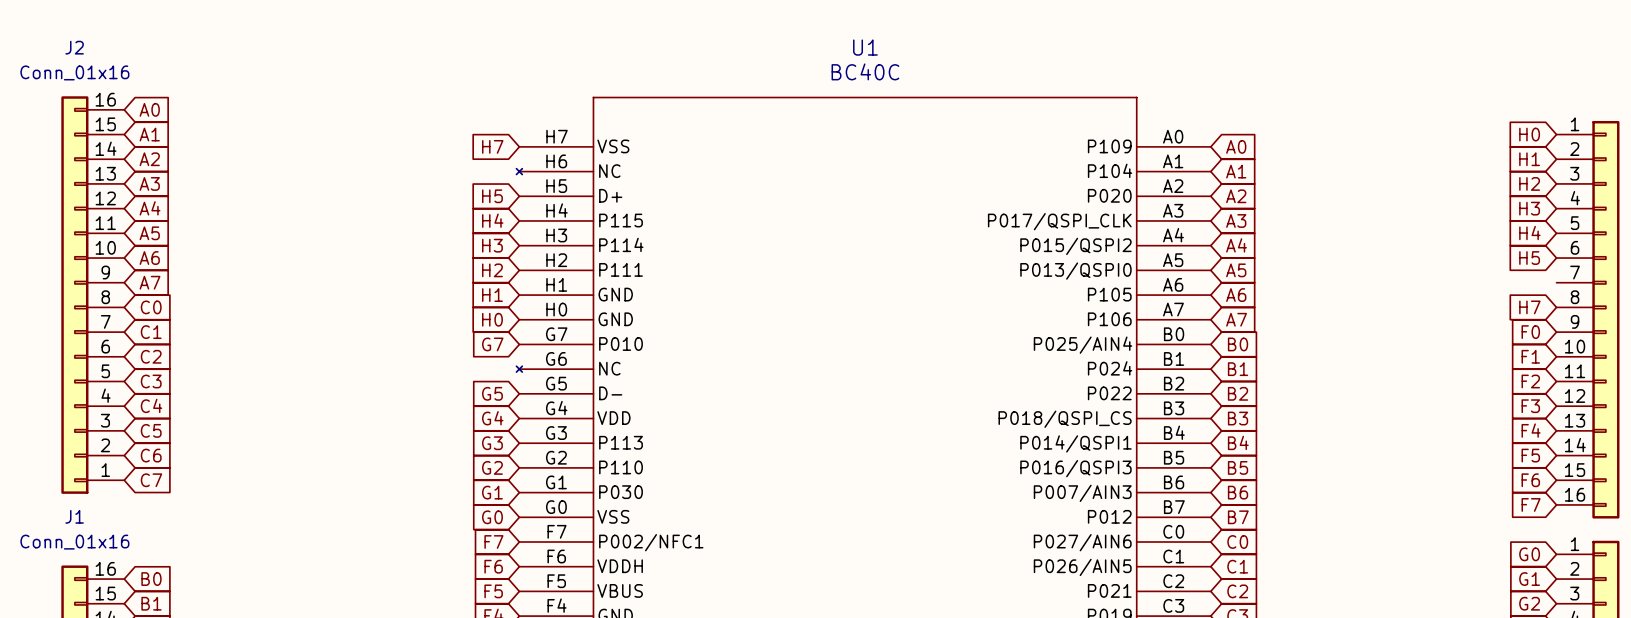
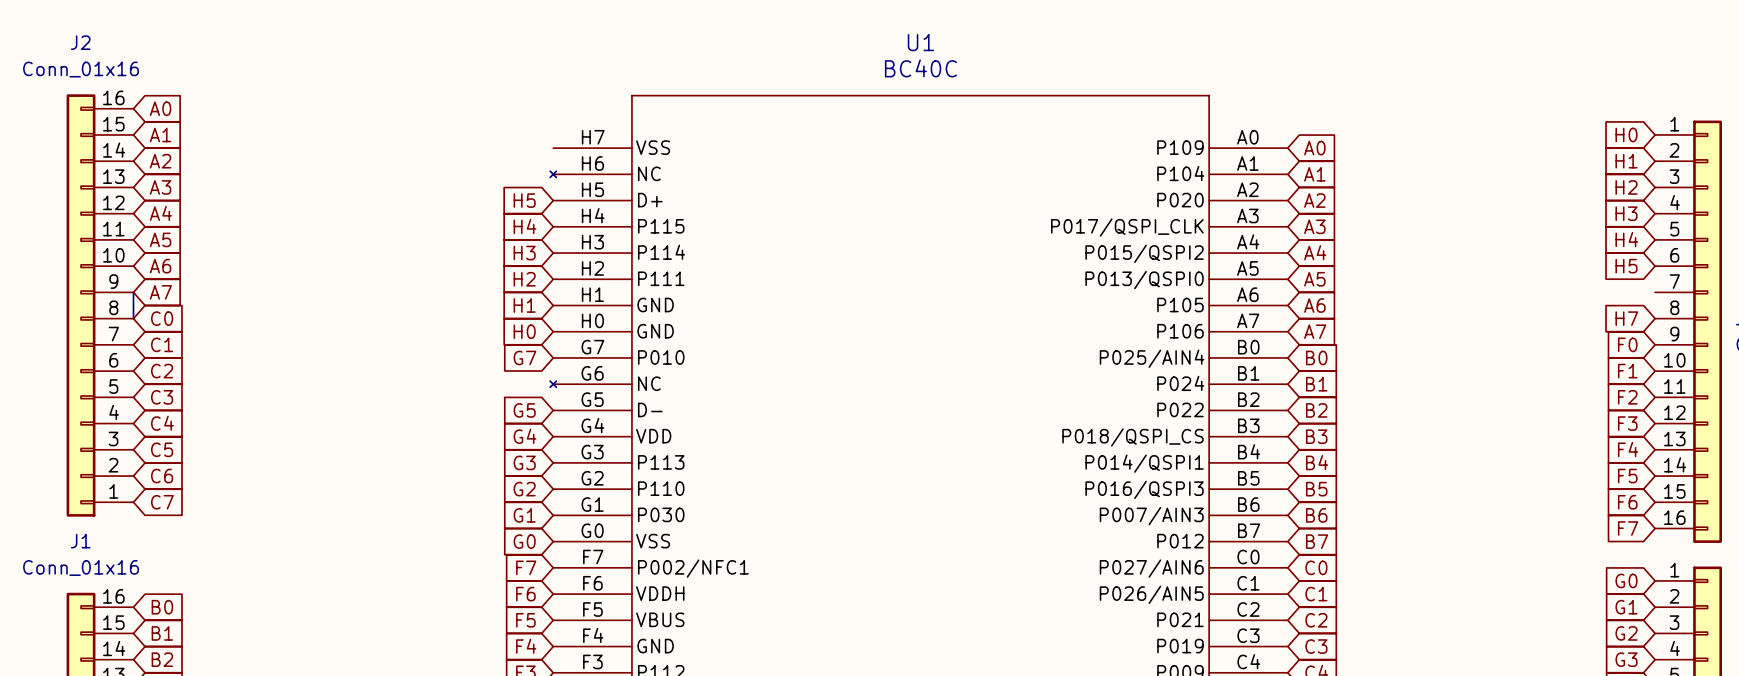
global label: H7 (492, 146) -> none
wire: none -> (133, 292) (133, 318)

